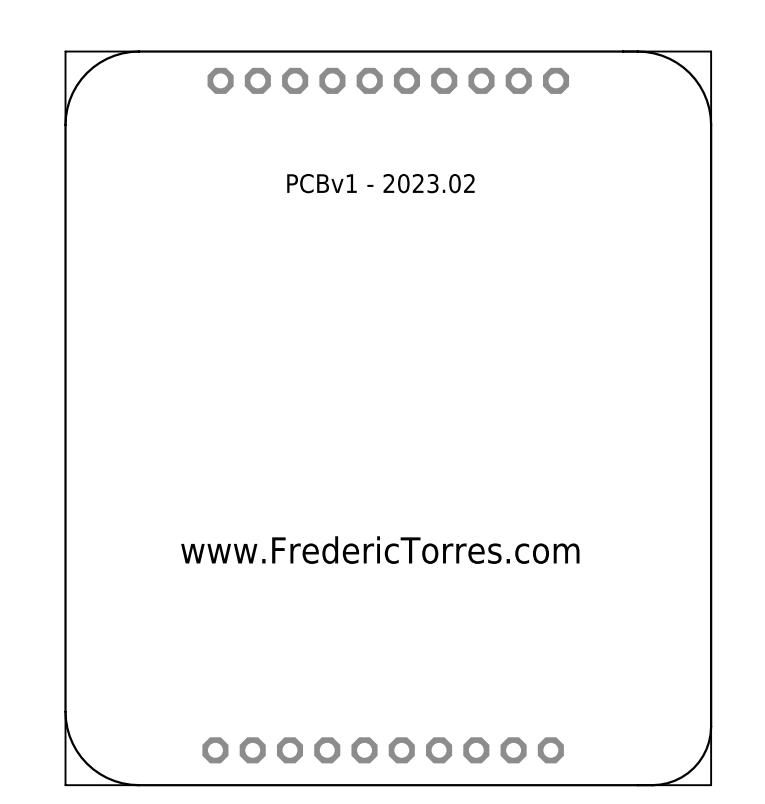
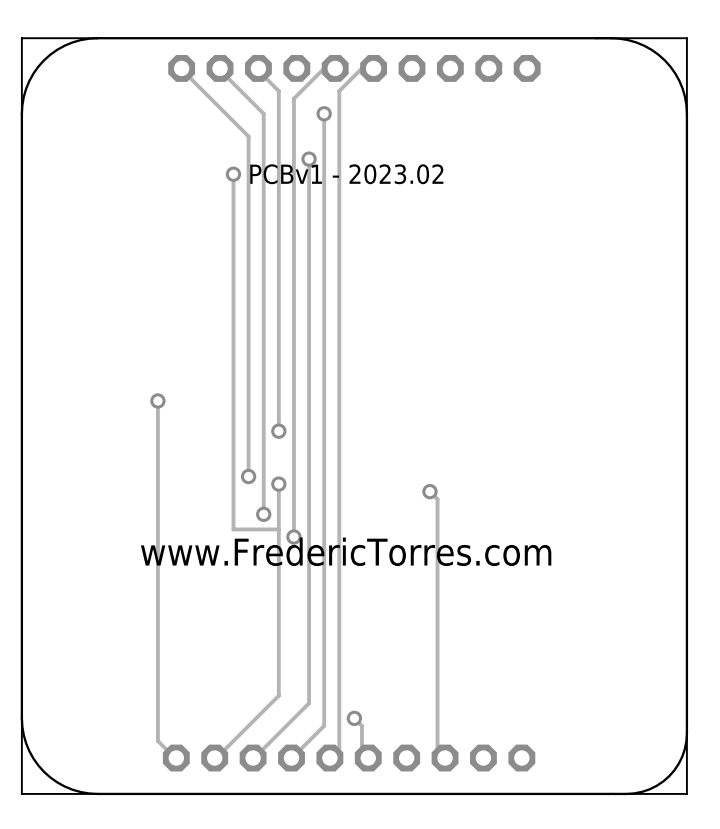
track: none -> (176, 68) (180, 68) (248, 136) (248, 476)
track: none -> (215, 68) (218, 68) (263, 113) (263, 514)
track: none -> (253, 68) (256, 68) (278, 91) (278, 431)
track: none -> (330, 68) (324, 68) (293, 98) (293, 536)
track: none -> (368, 68) (361, 68) (339, 91) (339, 748) (329, 758)
track: none -> (324, 113) (324, 725) (291, 758)
via: none -> (324, 113)
track: none -> (309, 159) (309, 703) (253, 758)
via: none -> (309, 159)
track: none -> (233, 174) (233, 529) (278, 529)
via: none -> (233, 174)
track: none -> (157, 400) (157, 741) (176, 758)
via: none -> (157, 400)
via: none -> (278, 431)
via: none -> (248, 476)
track: none -> (278, 484) (278, 695) (214, 758)
via: none -> (278, 484)
track: none -> (429, 491) (437, 499) (437, 756) (445, 758)
via: none -> (429, 491)
via: none -> (263, 514)
via: none -> (293, 536)
track: none -> (354, 718) (361, 725) (361, 756) (368, 758)
via: none -> (354, 718)

